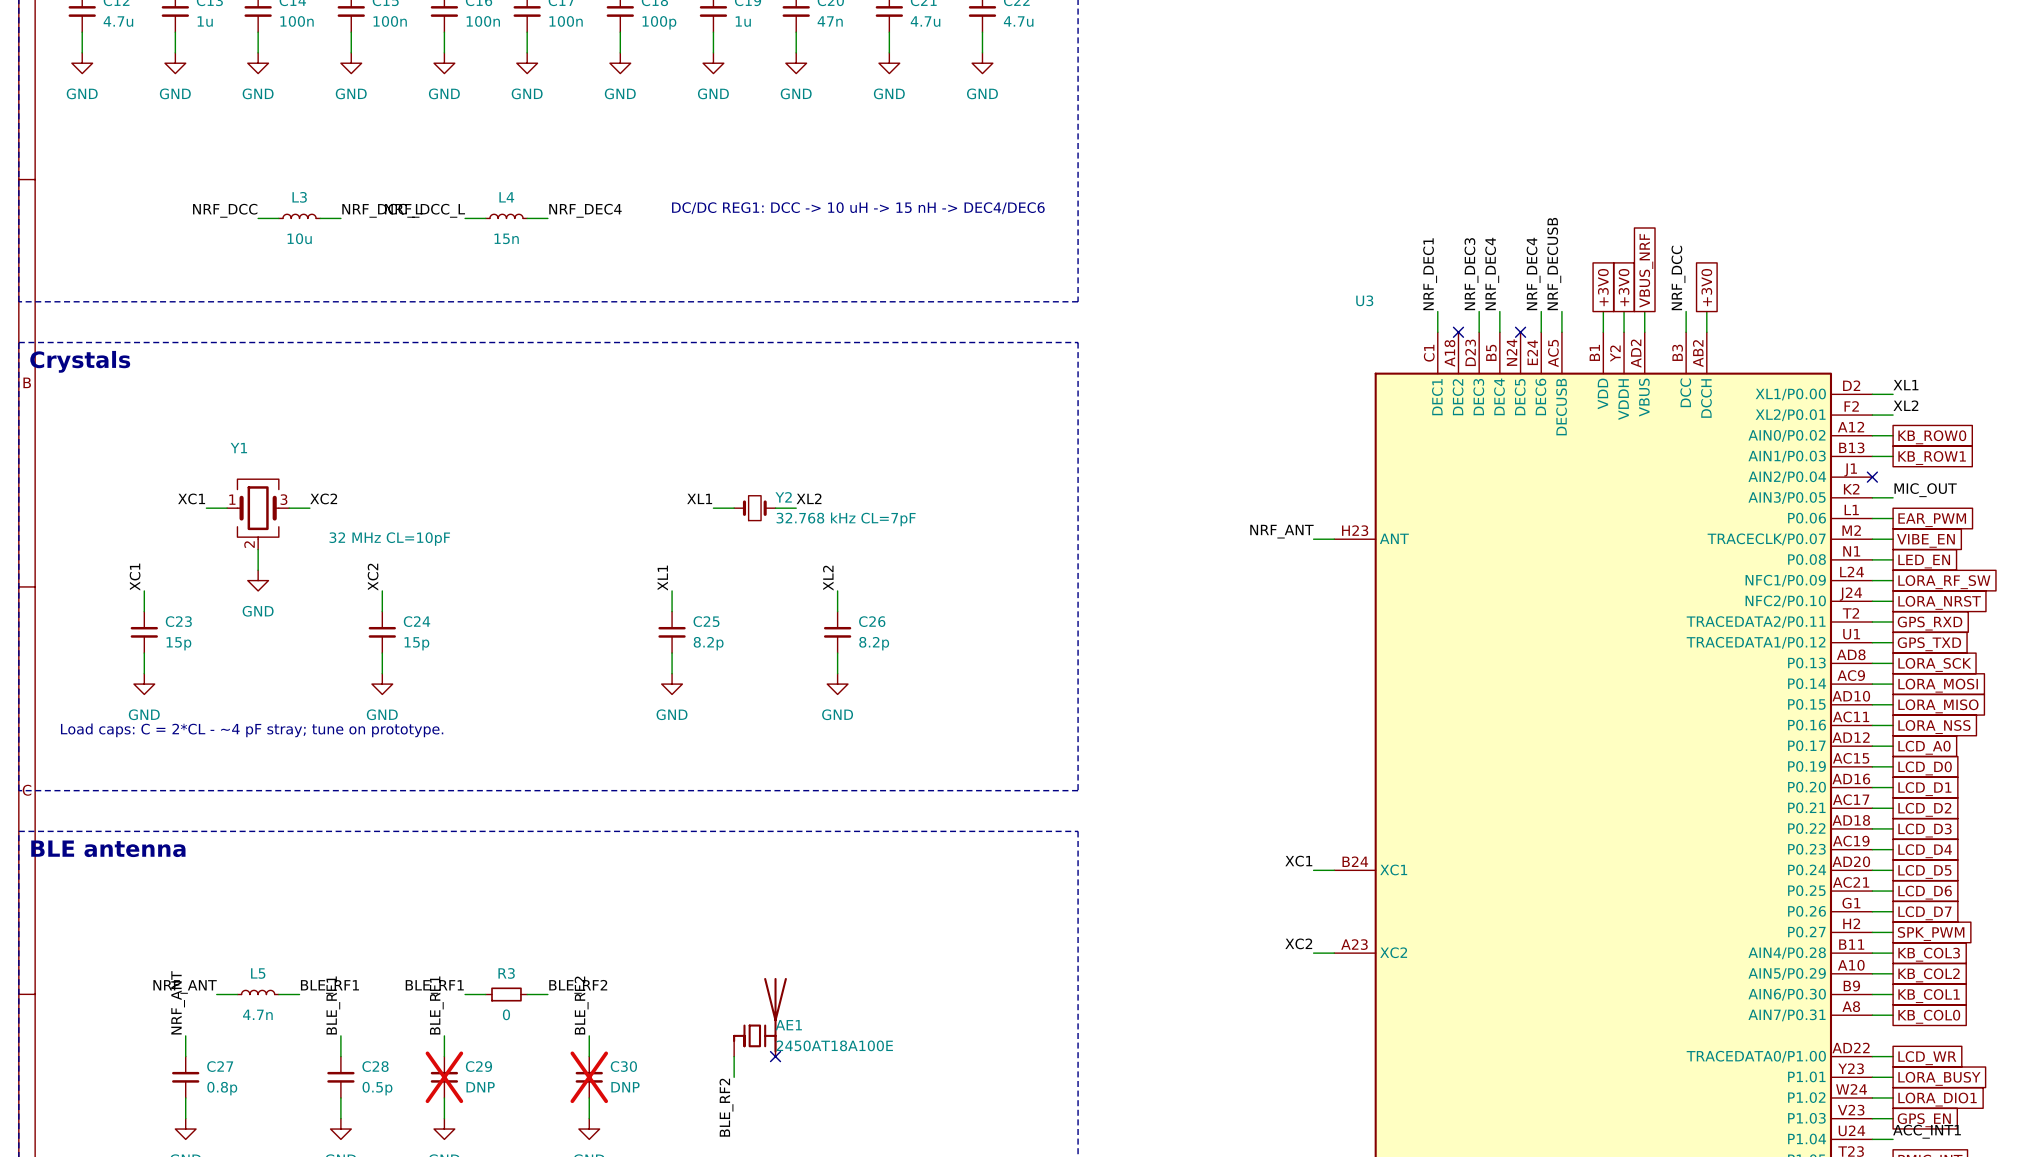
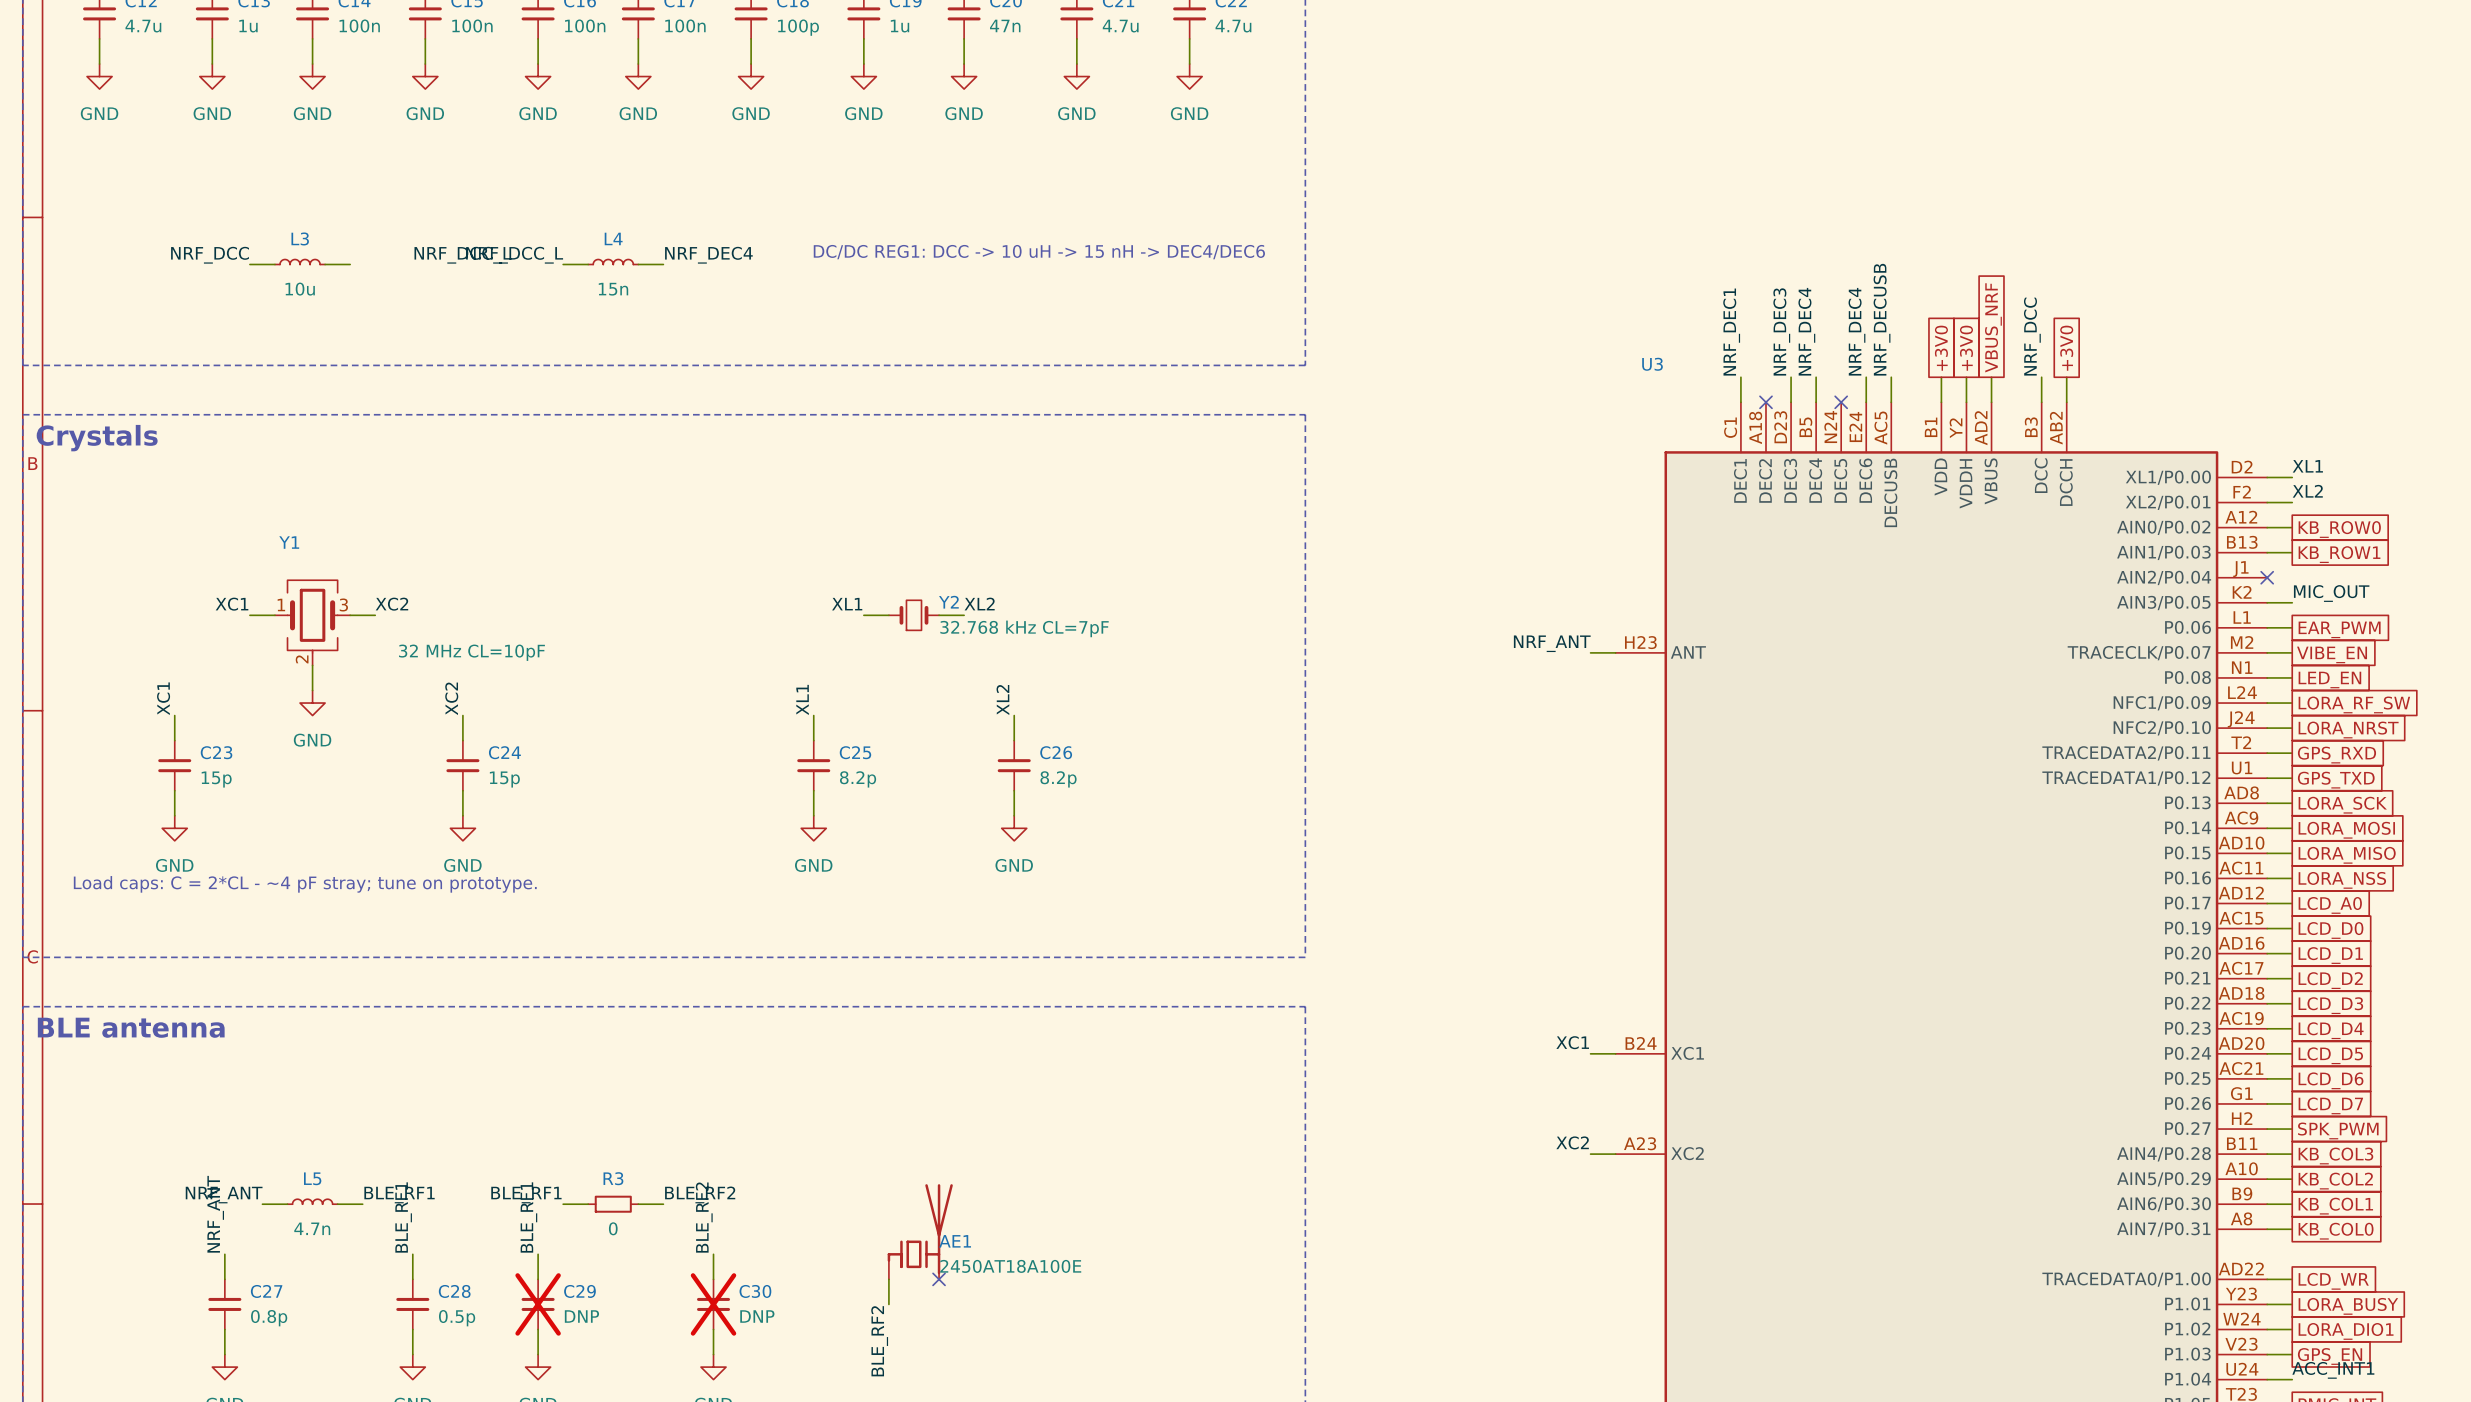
label position: NRF_DCC (225, 210) -> NRF_DCC (210, 255)
L3 position: (299, 216) -> (300, 262)
wire: (258, 218) (268, 218) -> (337, 264) (350, 264)
wire: (320, 218) (340, 218) -> (249, 264) (274, 264)

